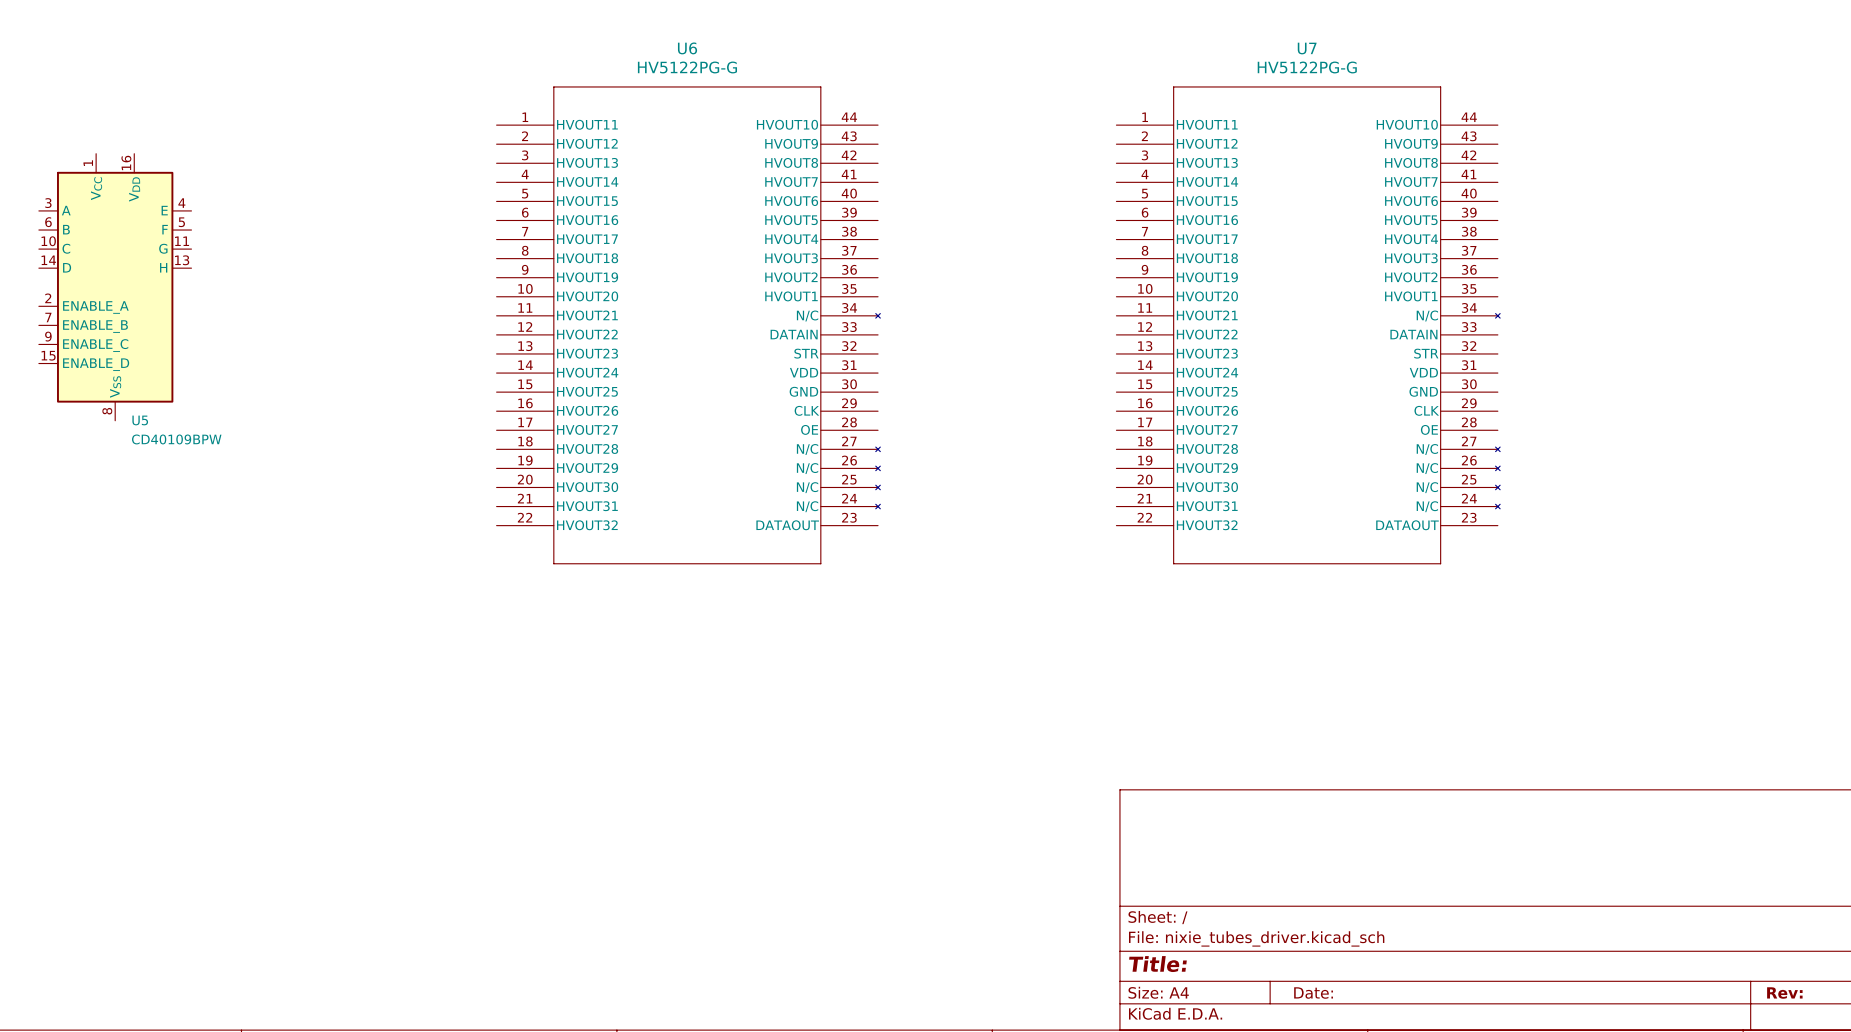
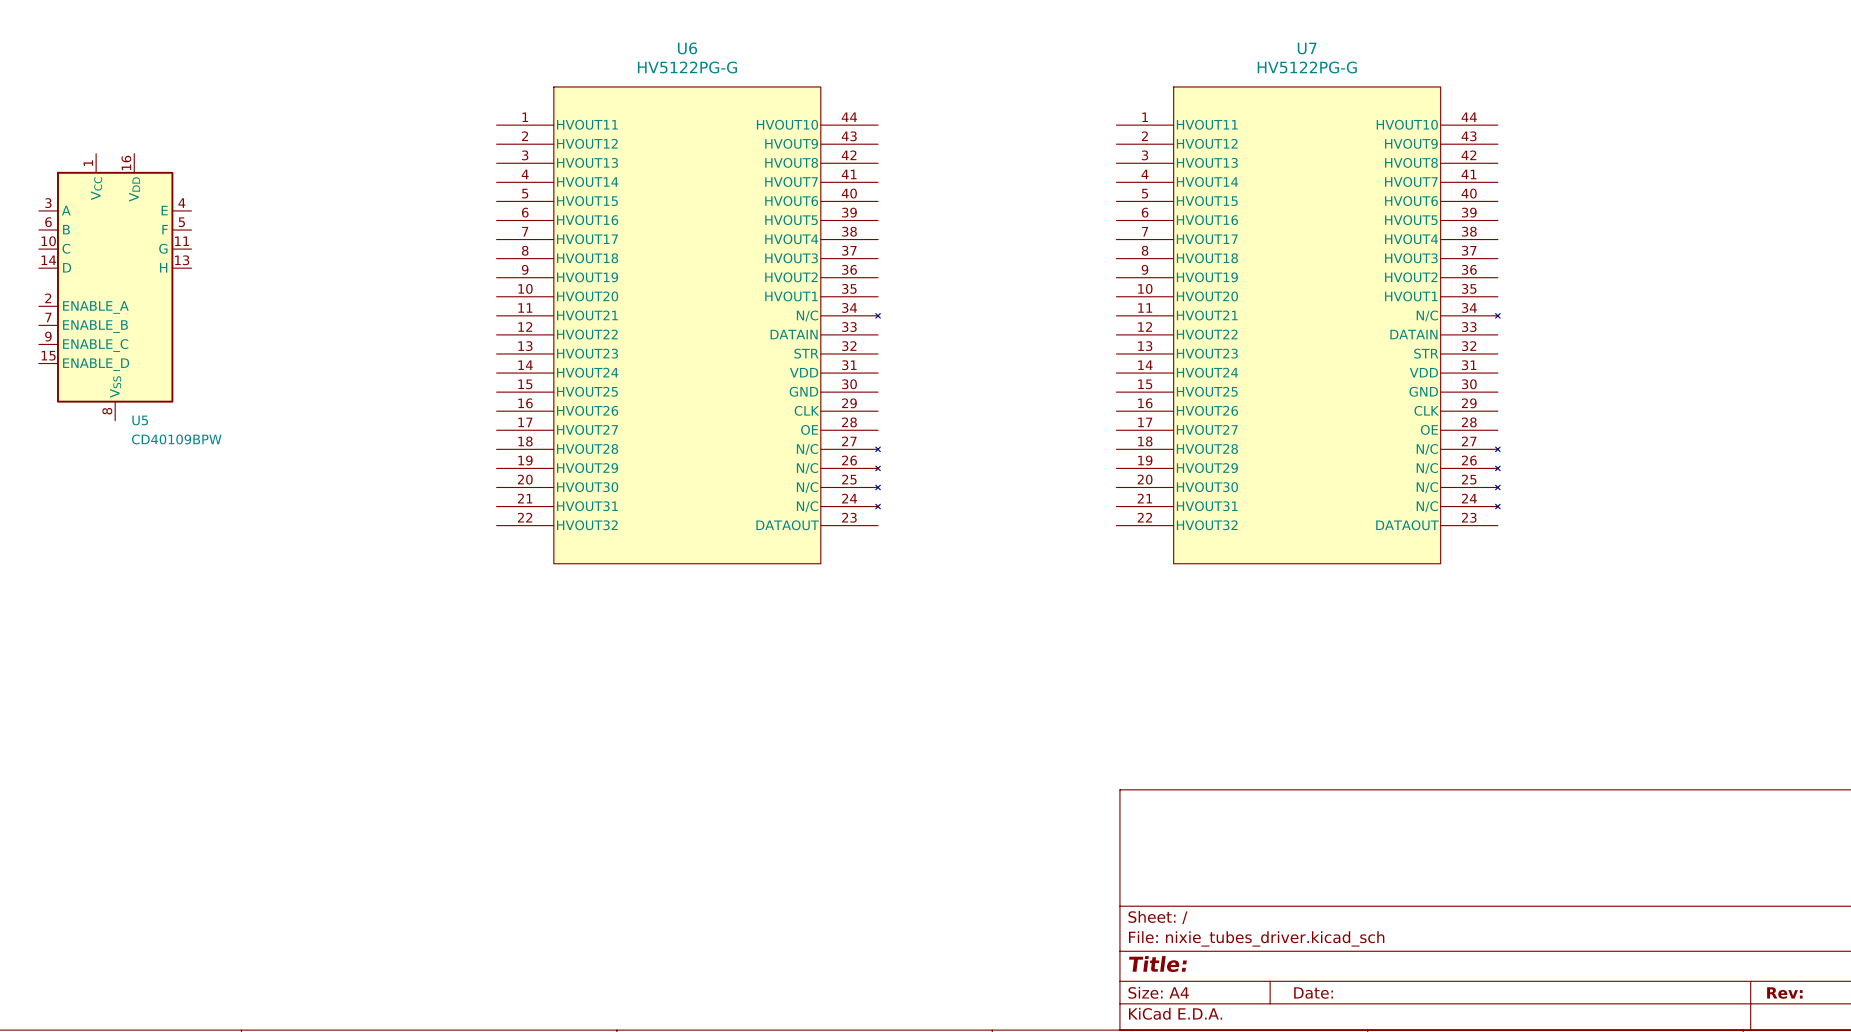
U6 symbol: [496, 86, 881, 565] -> [496, 86, 881, 564]
U7 symbol: [1116, 86, 1501, 565] -> [1116, 86, 1501, 564]

